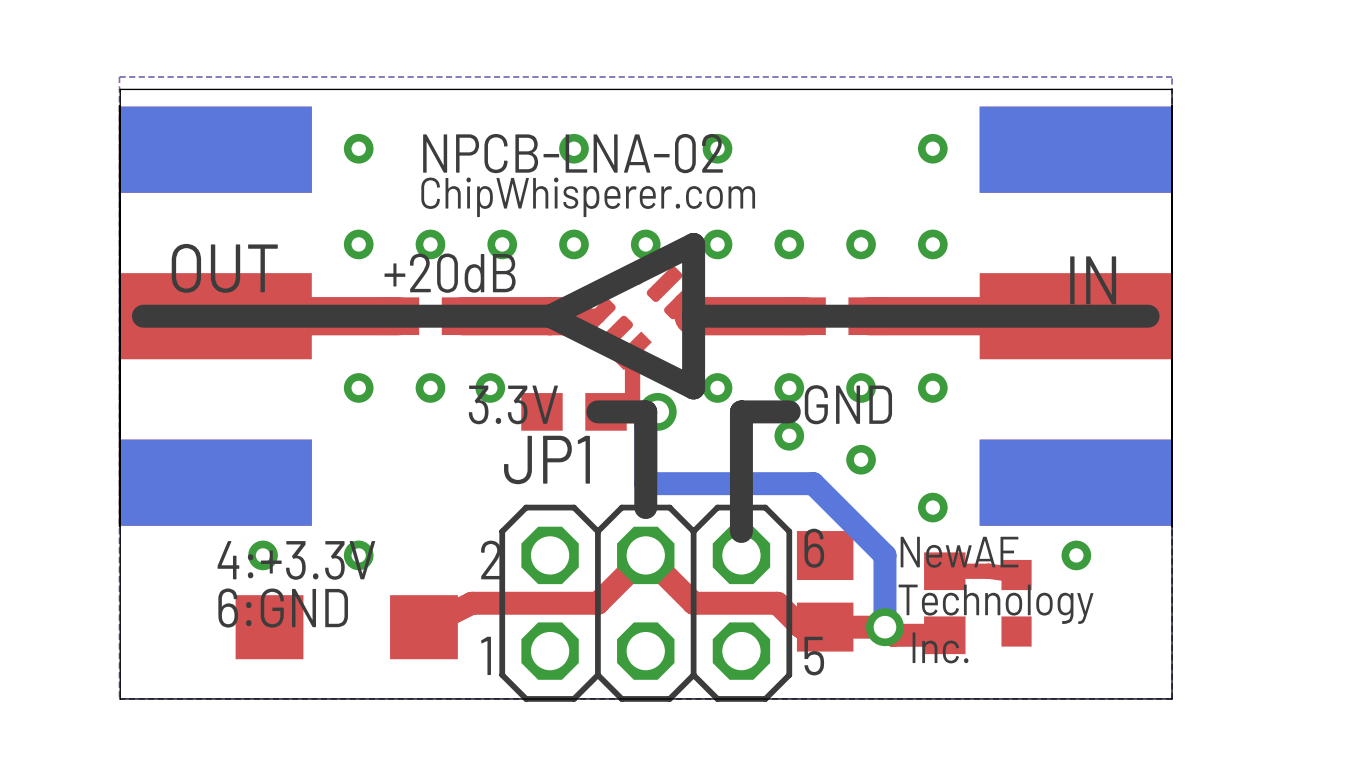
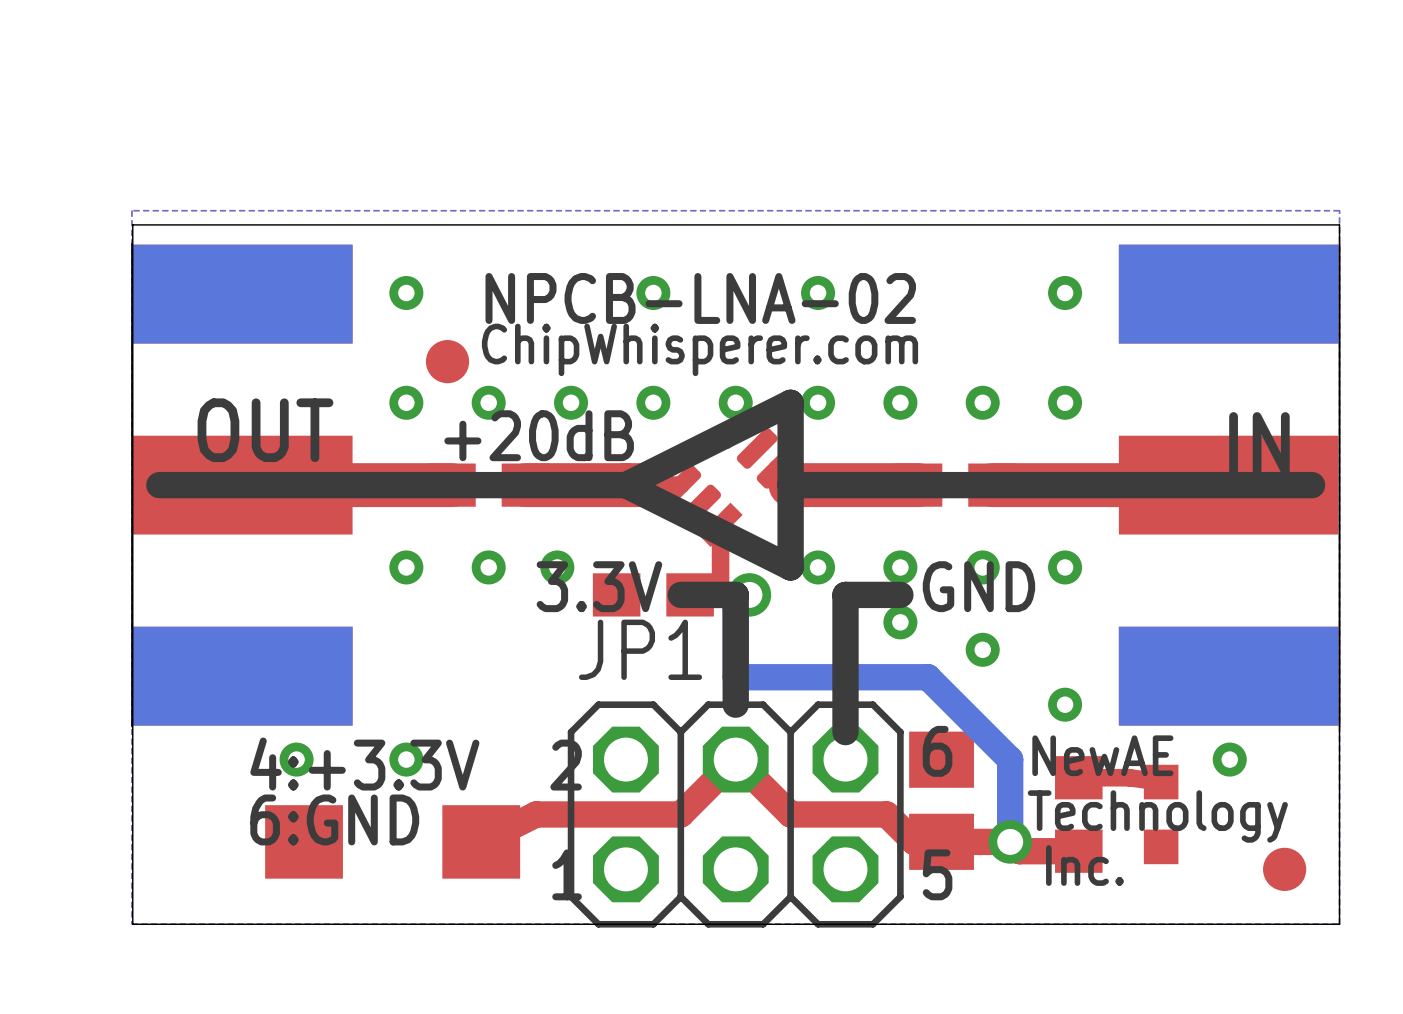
part: none -> (447, 361)
part: none -> (1284, 869)

